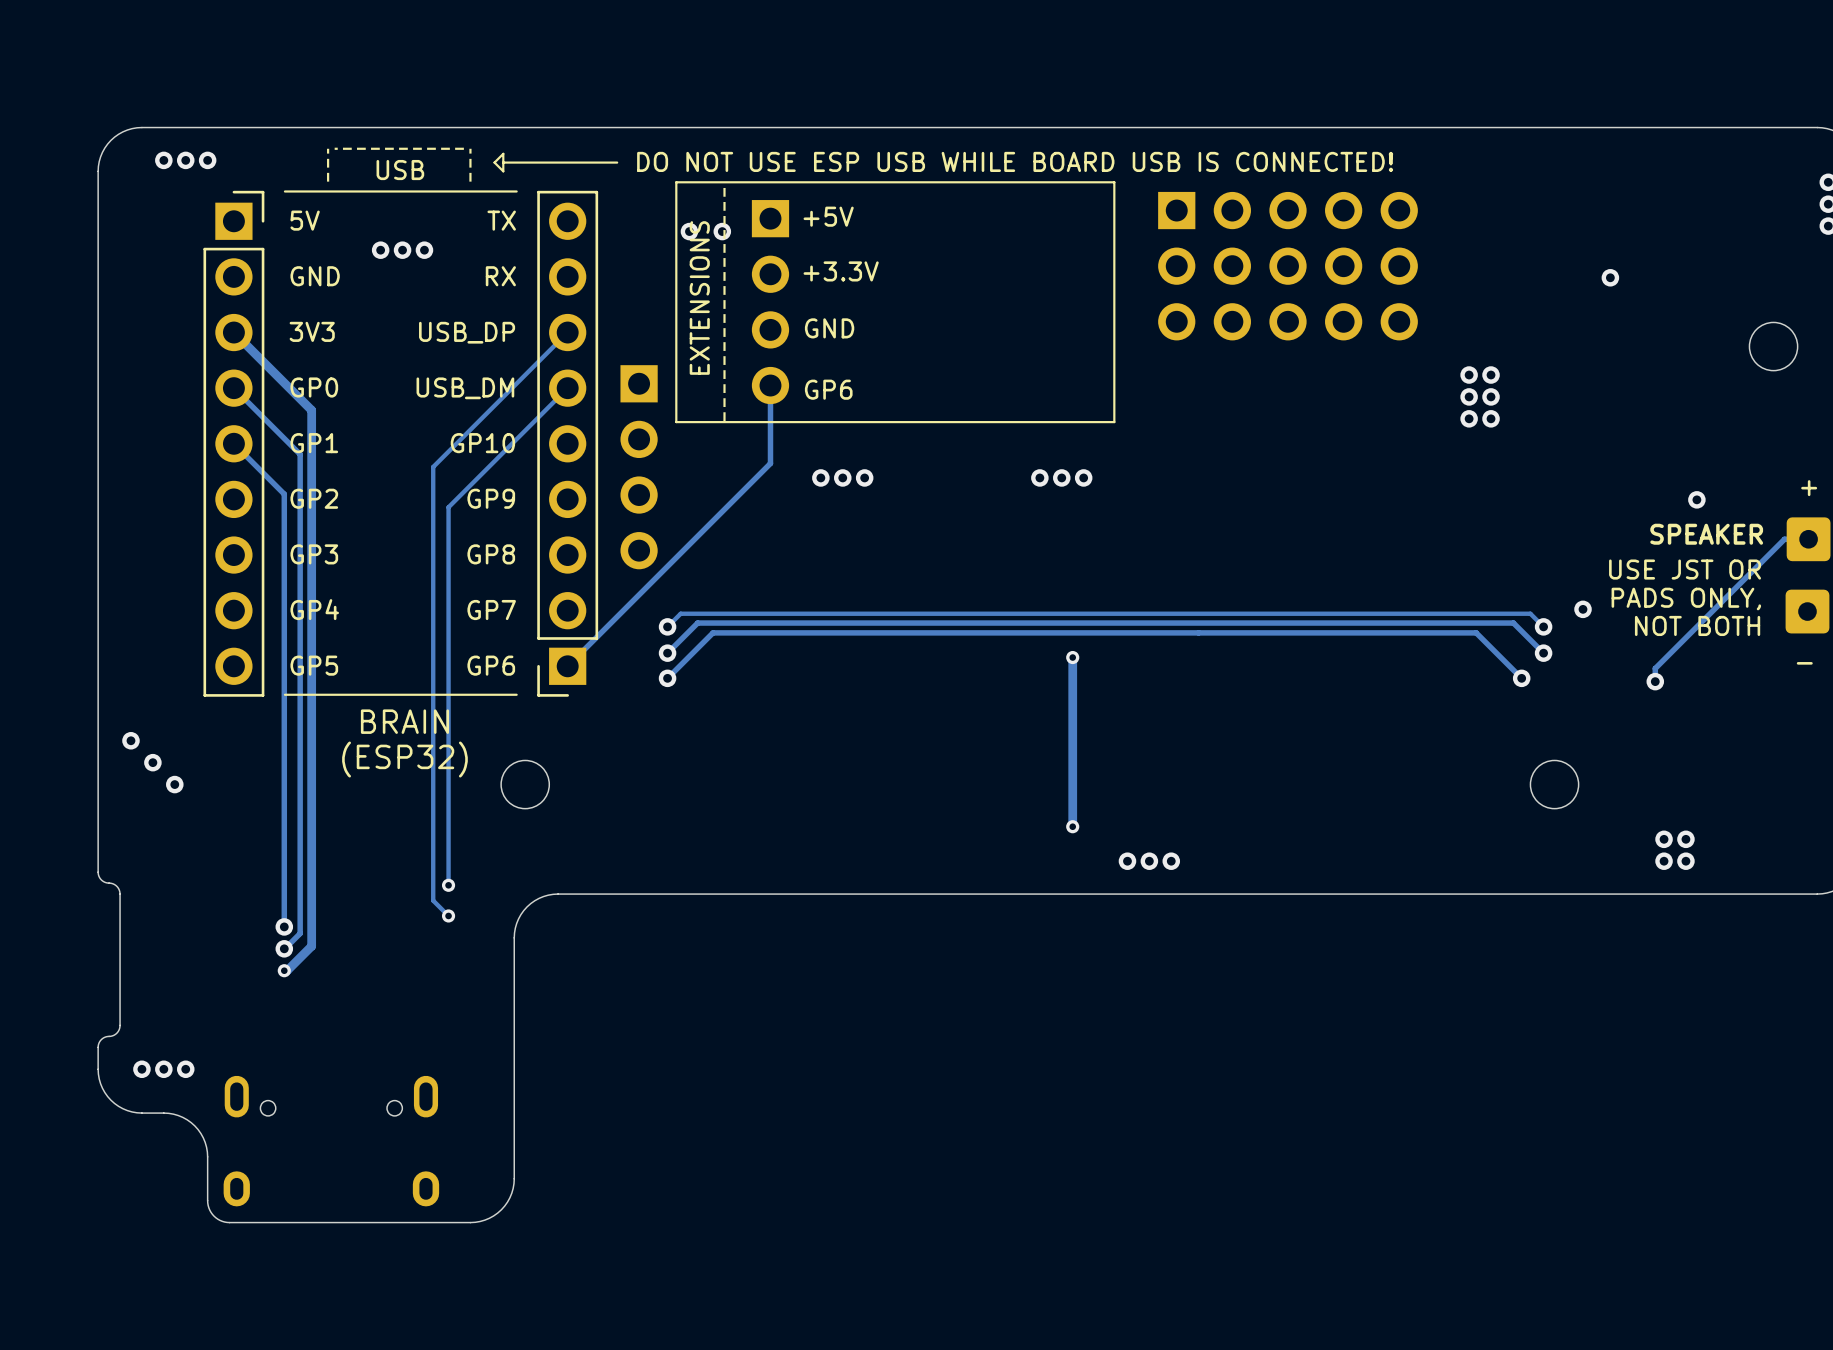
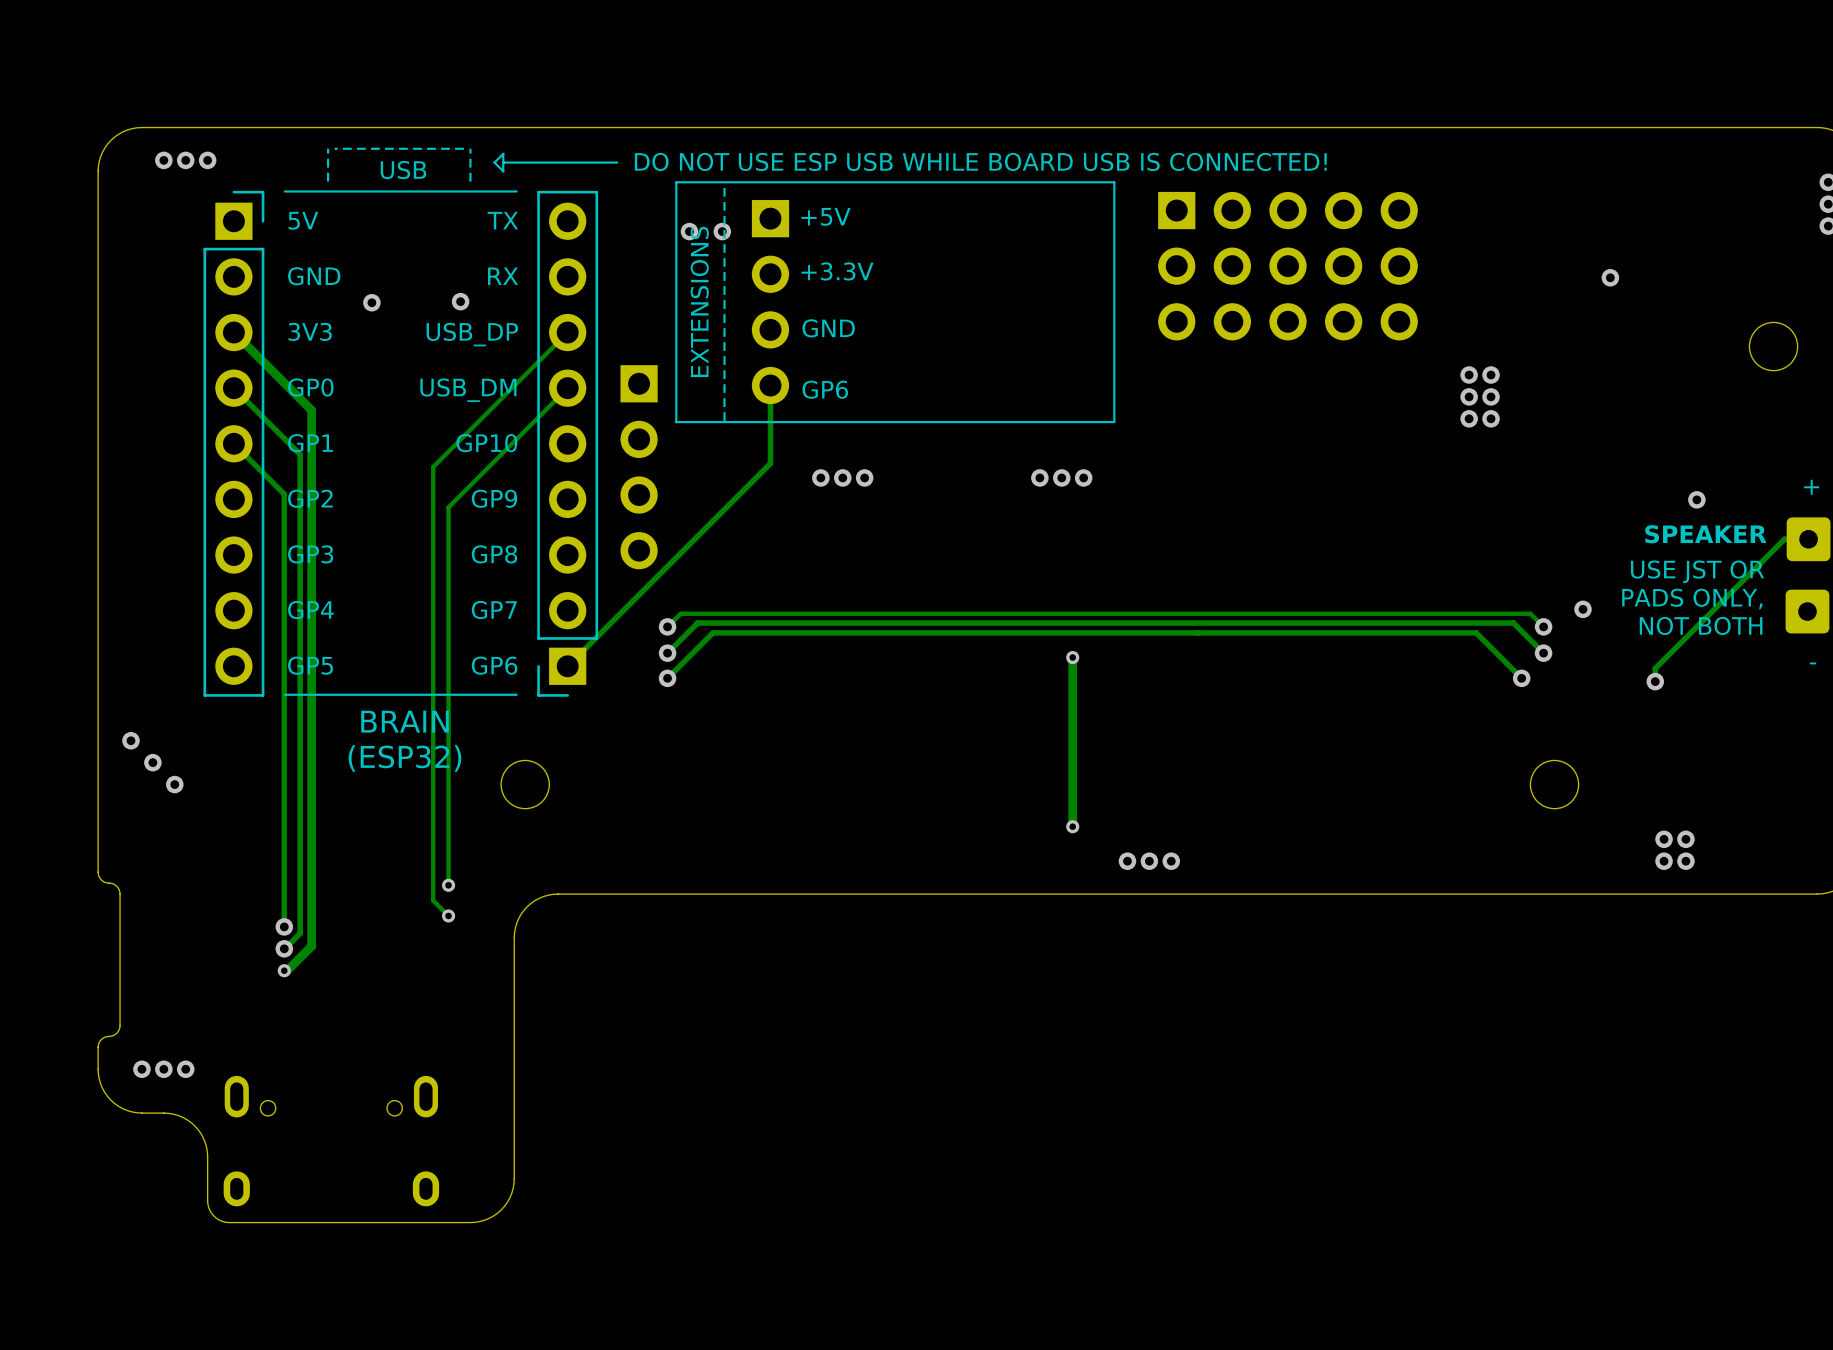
via: (380, 250) -> none
via: (402, 250) -> none
via: (424, 250) -> none
via: none -> (460, 301)
via: none -> (371, 302)

